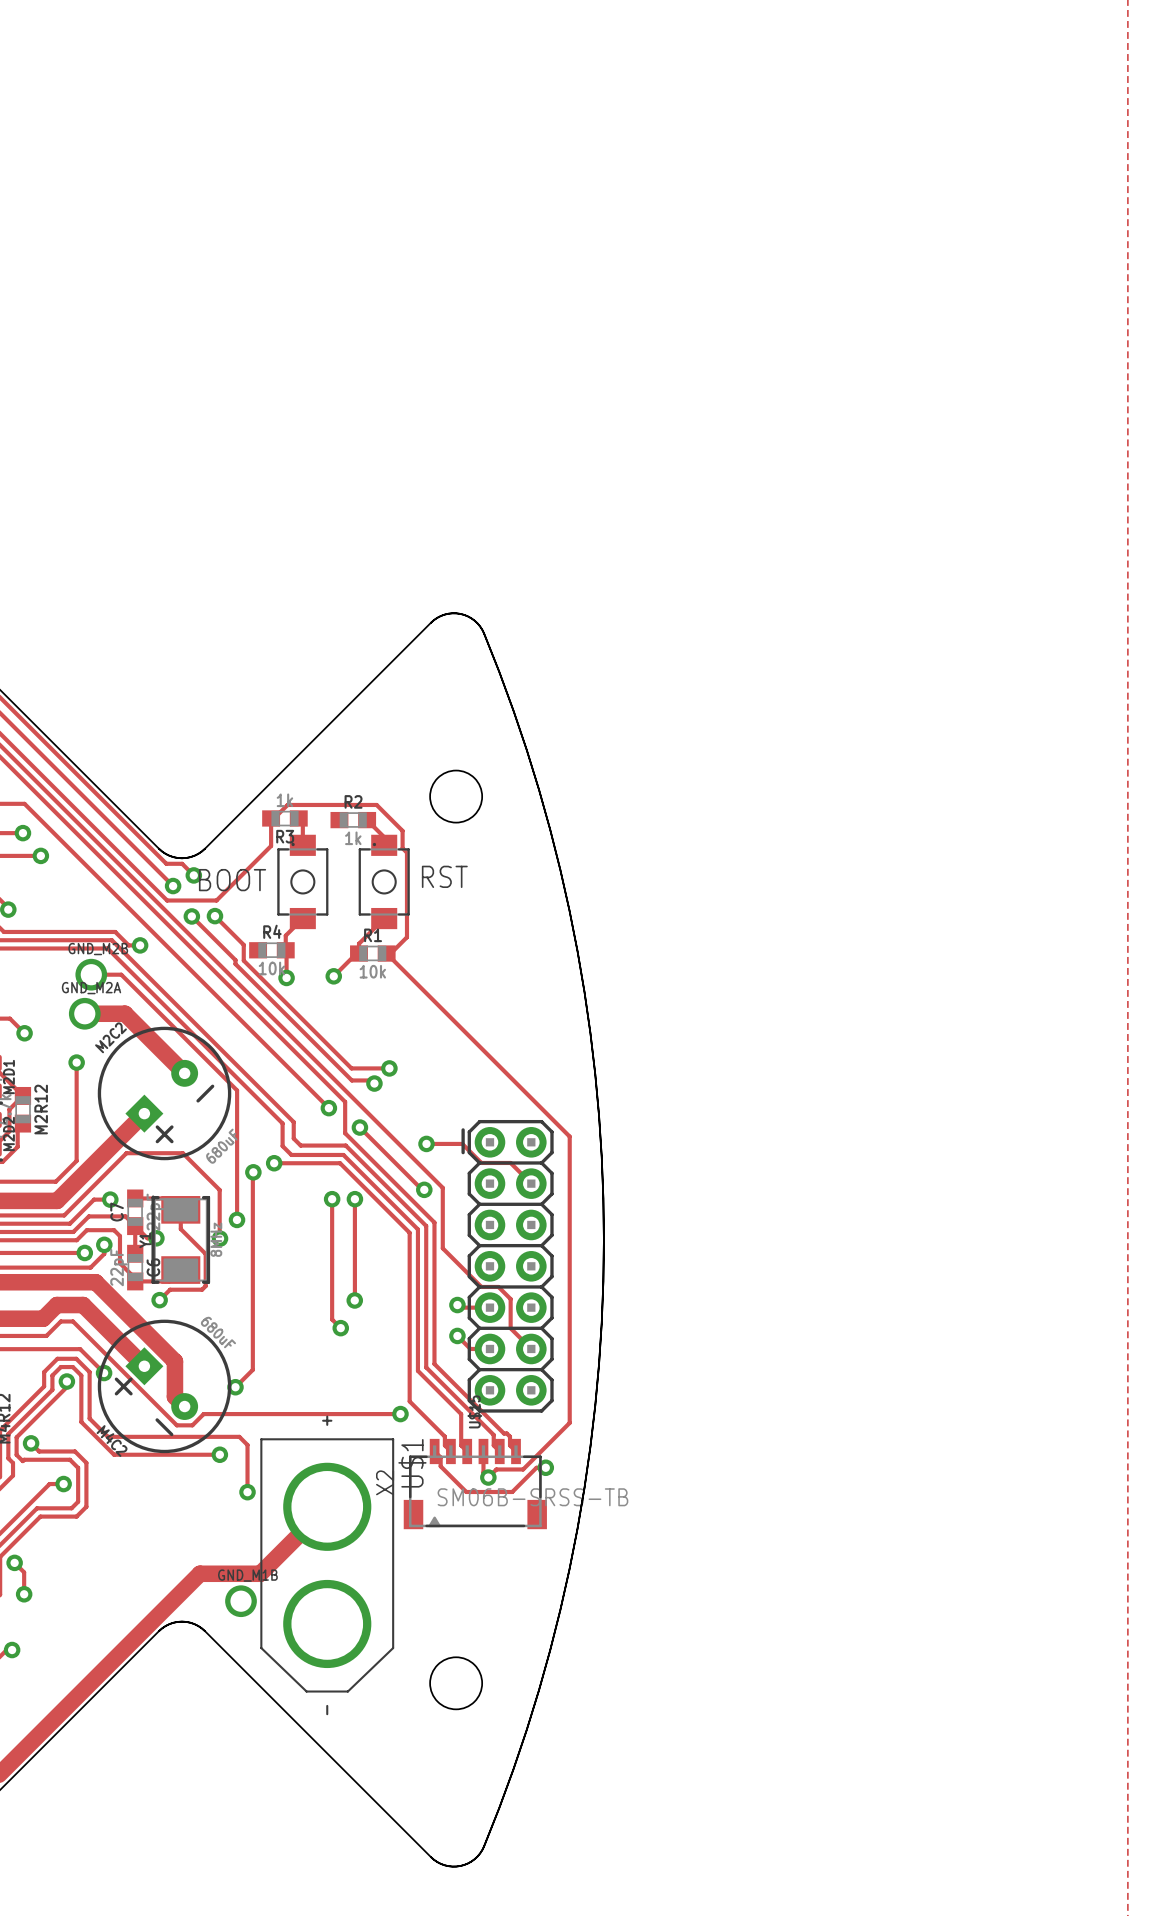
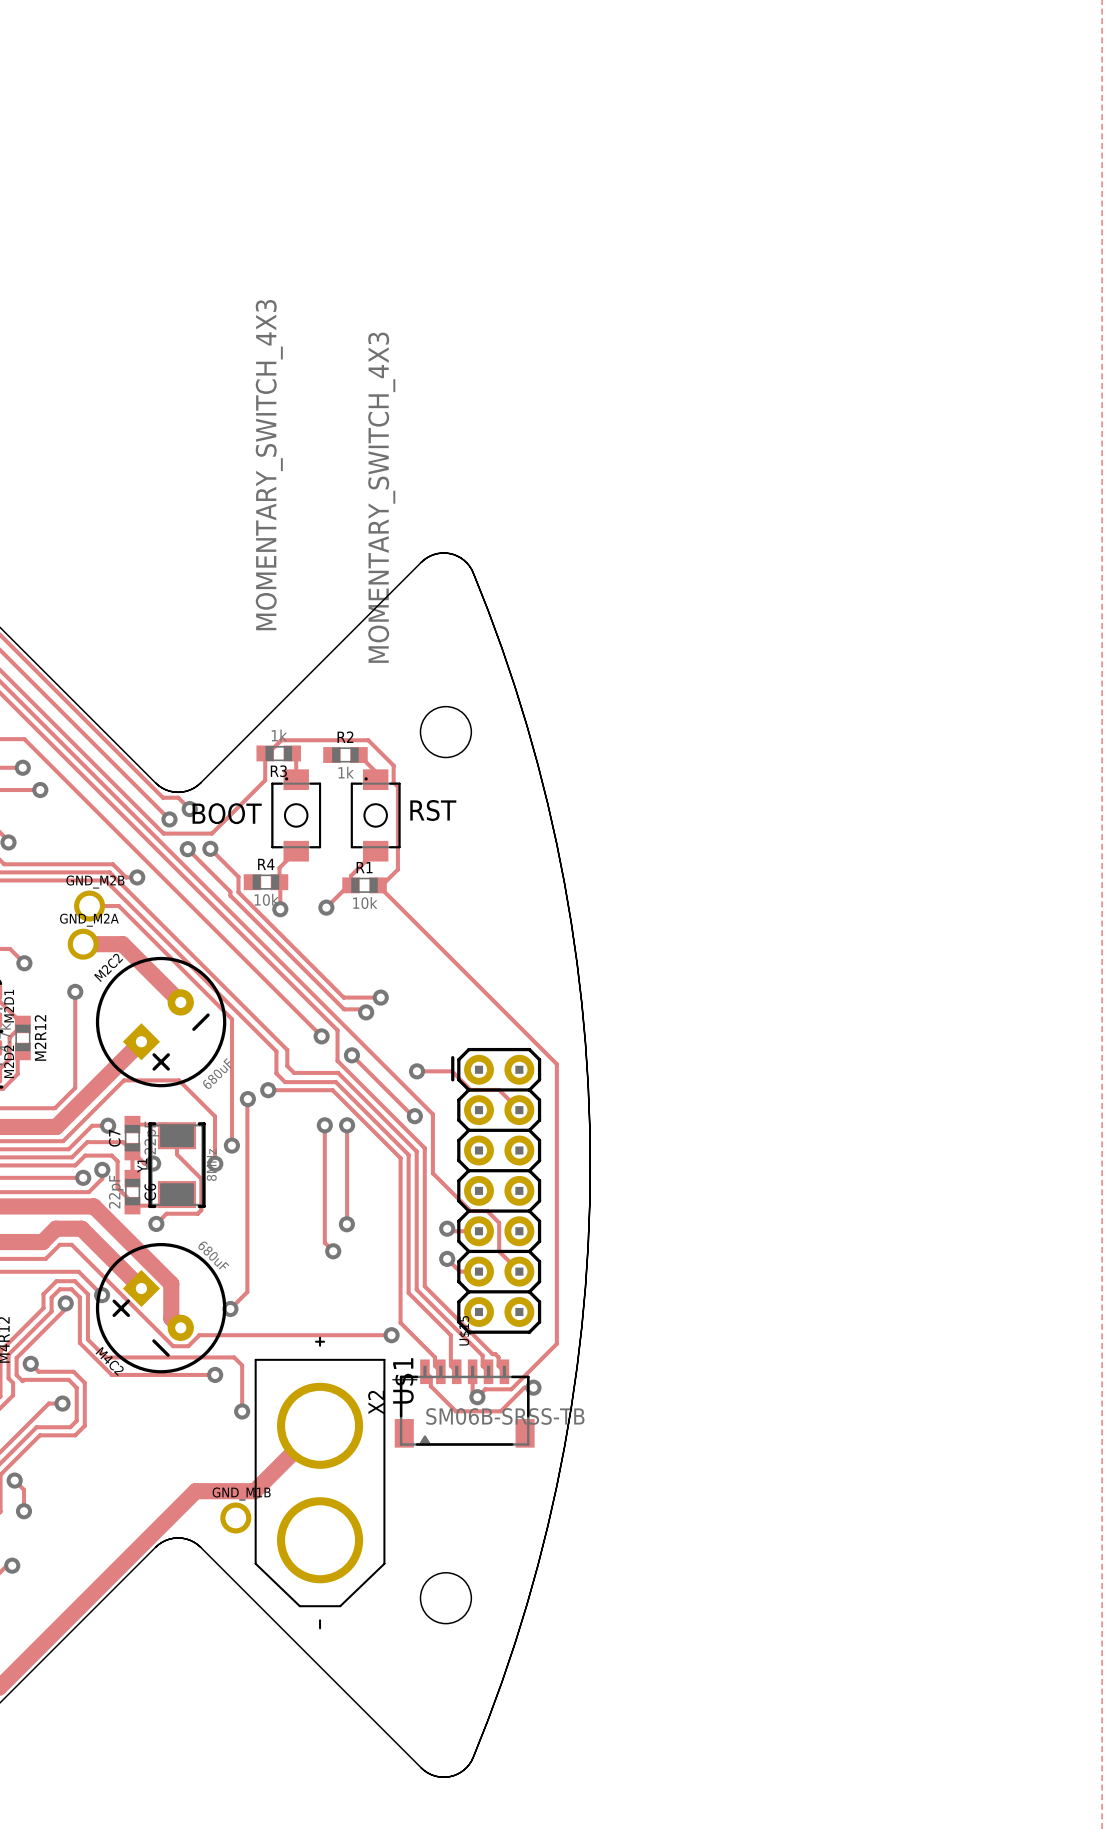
BOOT value: none -> MOMENTARY_SWITCH_4X3 (269, 465)
RST value: none -> MOMENTARY_SWITCH_4X3 (381, 497)

